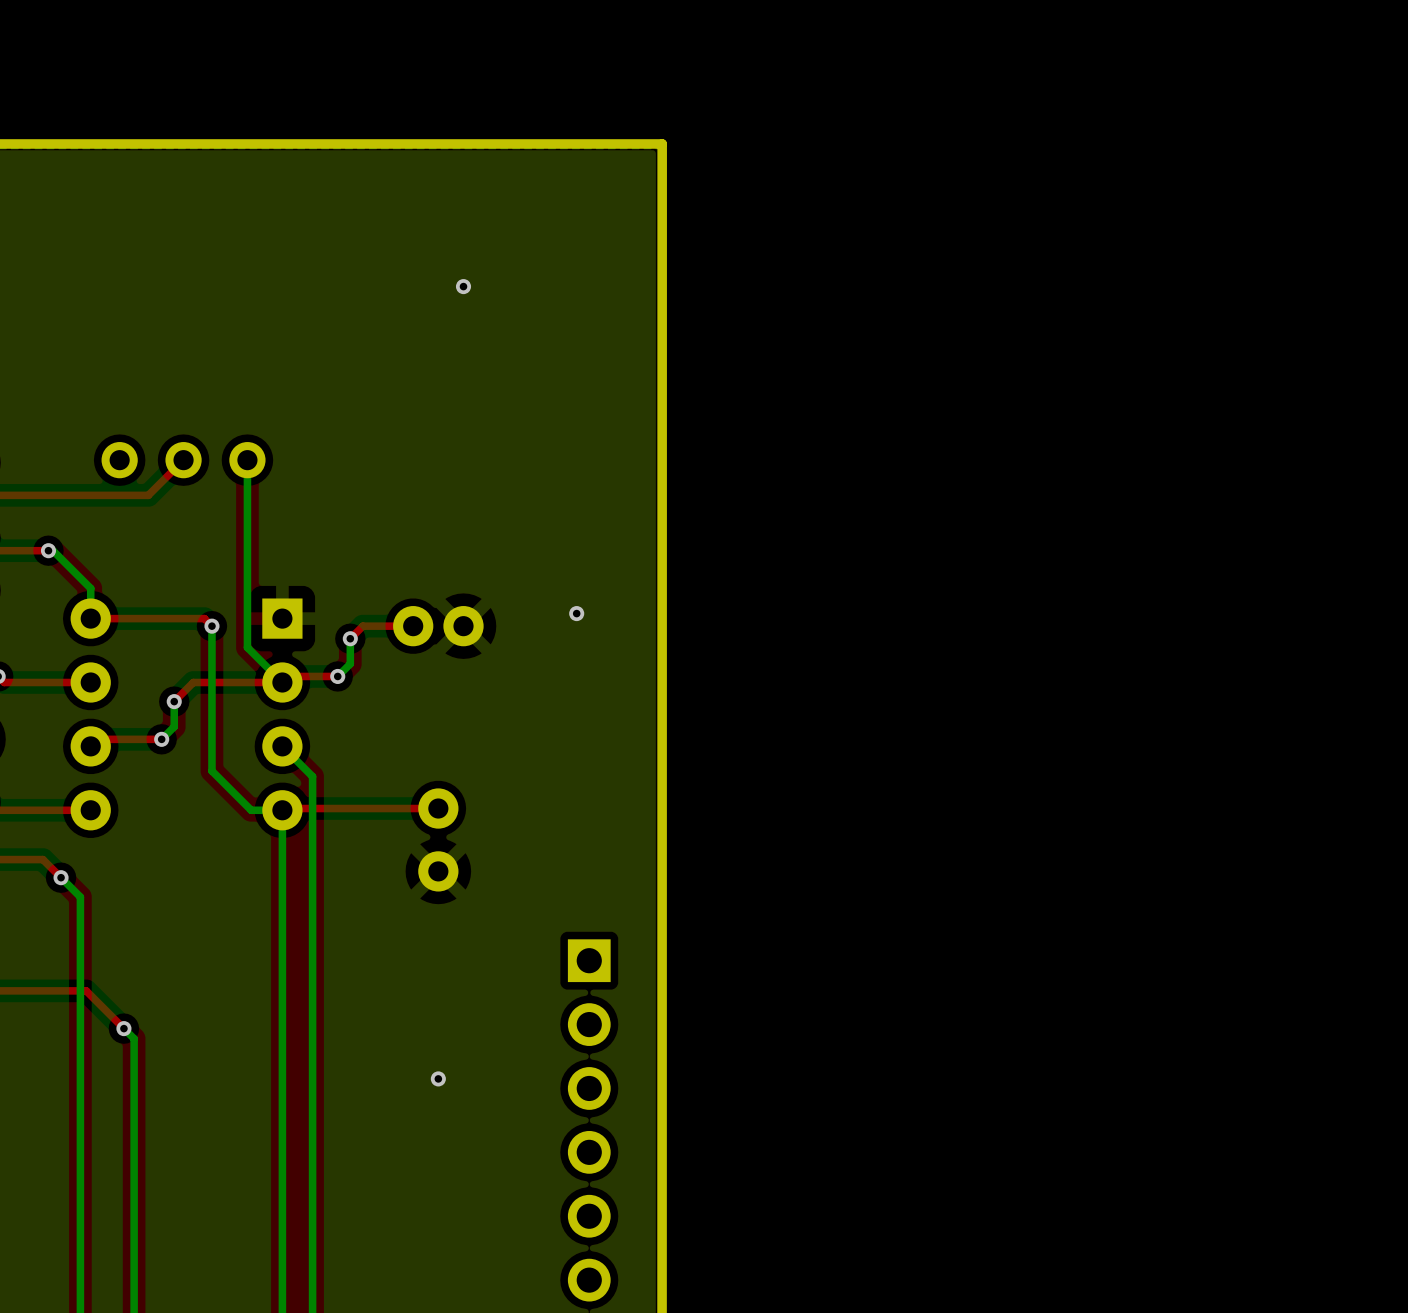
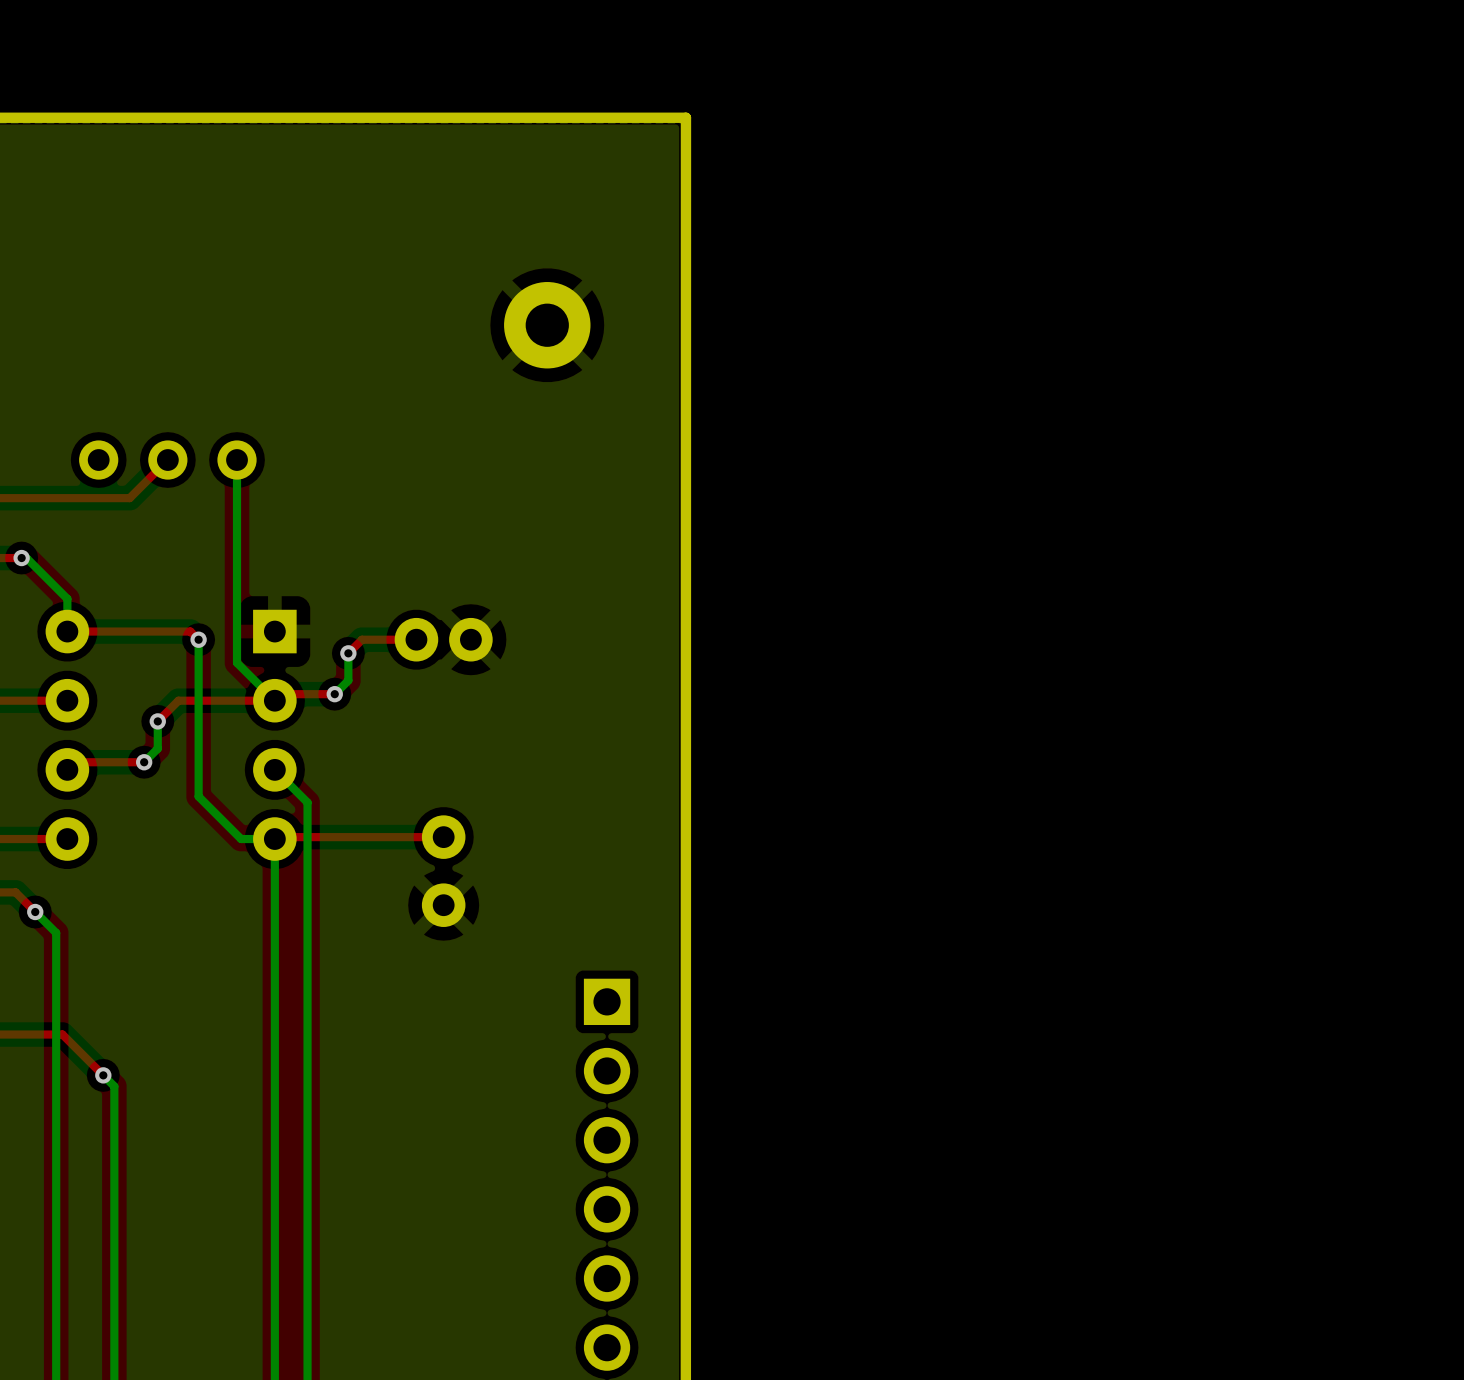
via: (463, 286) -> none
part: none -> (547, 325)
via: (576, 613) -> none
via: (438, 1078) -> none

